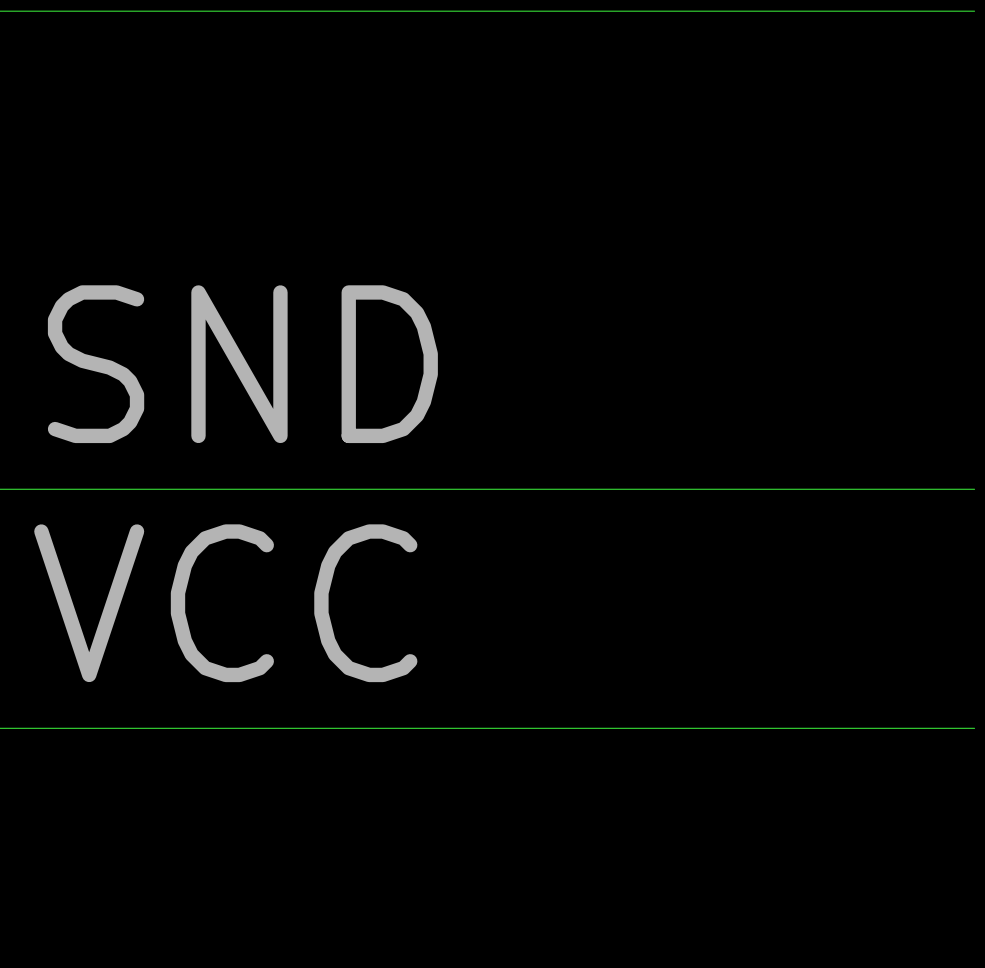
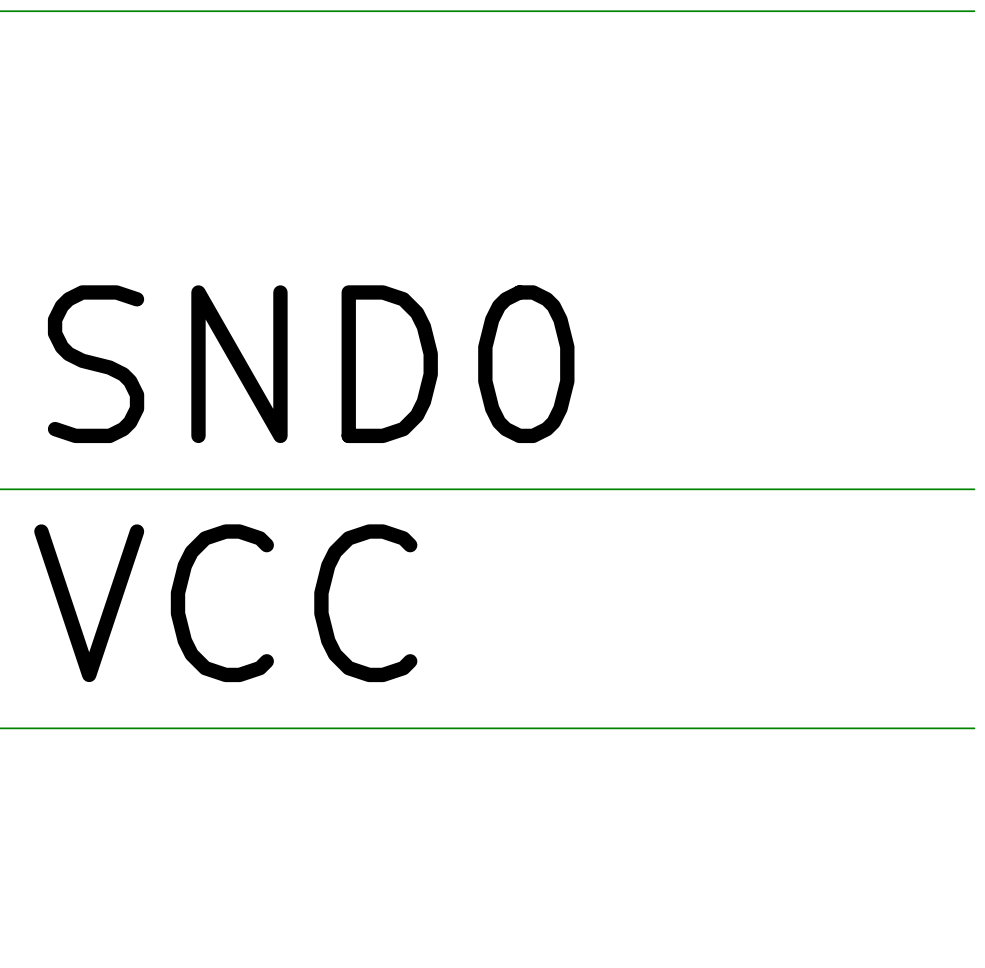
label: SND (242, 364) -> SND0 (311, 364)

